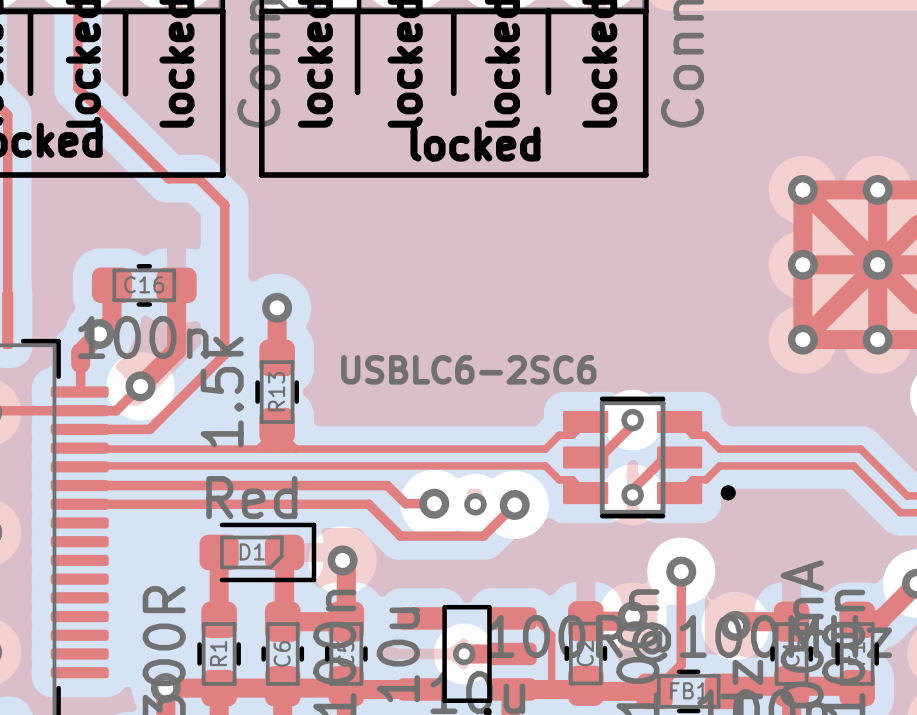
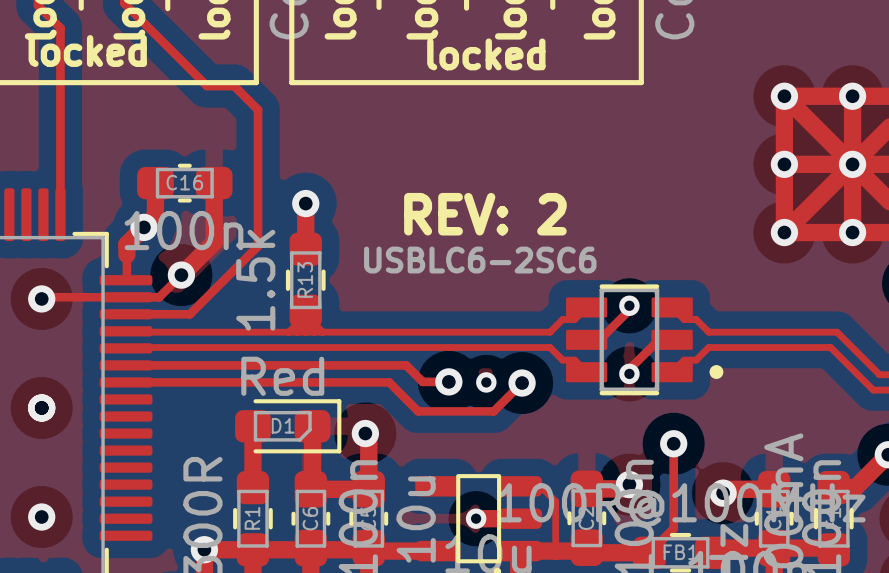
text: none -> REV: 2 (485, 214)

